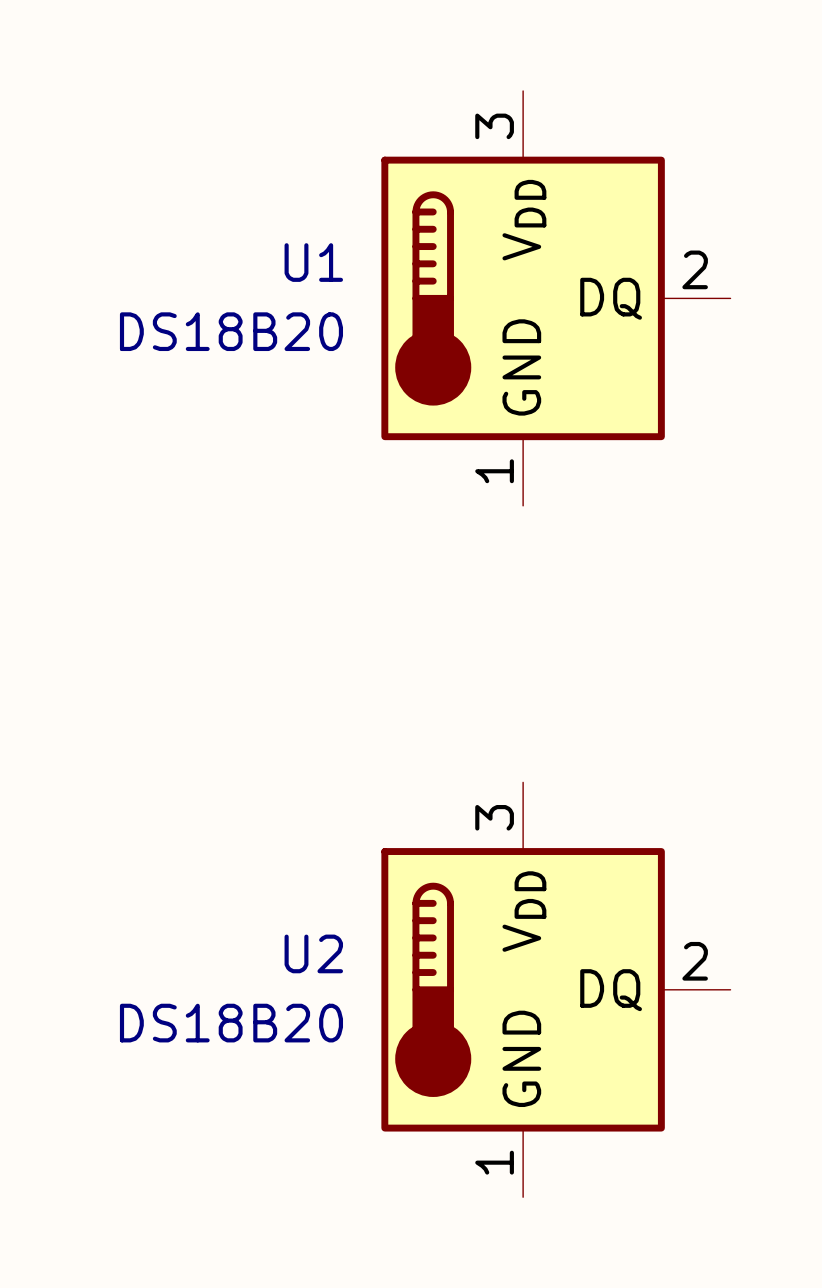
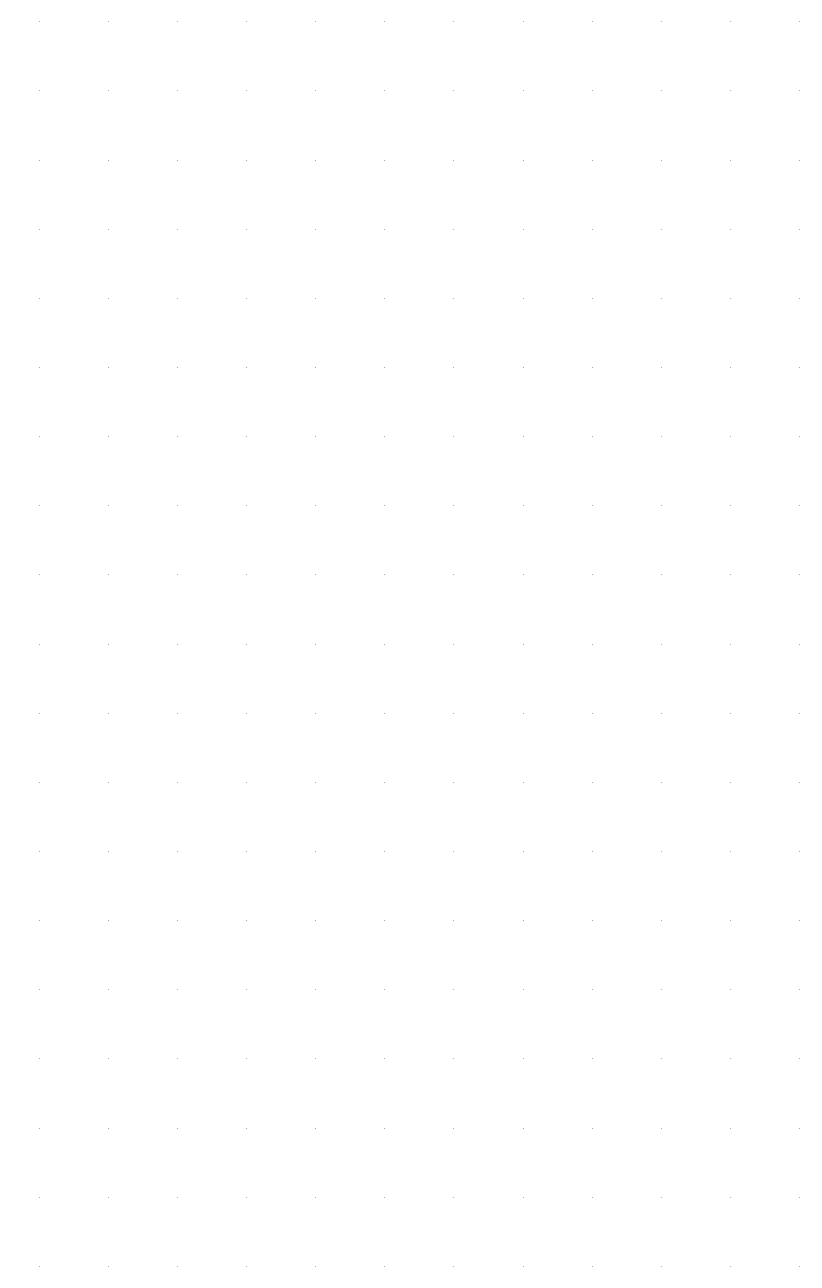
U1: DS18B20 (555, 298) -> none
U2: DS18B20 (555, 989) -> none

